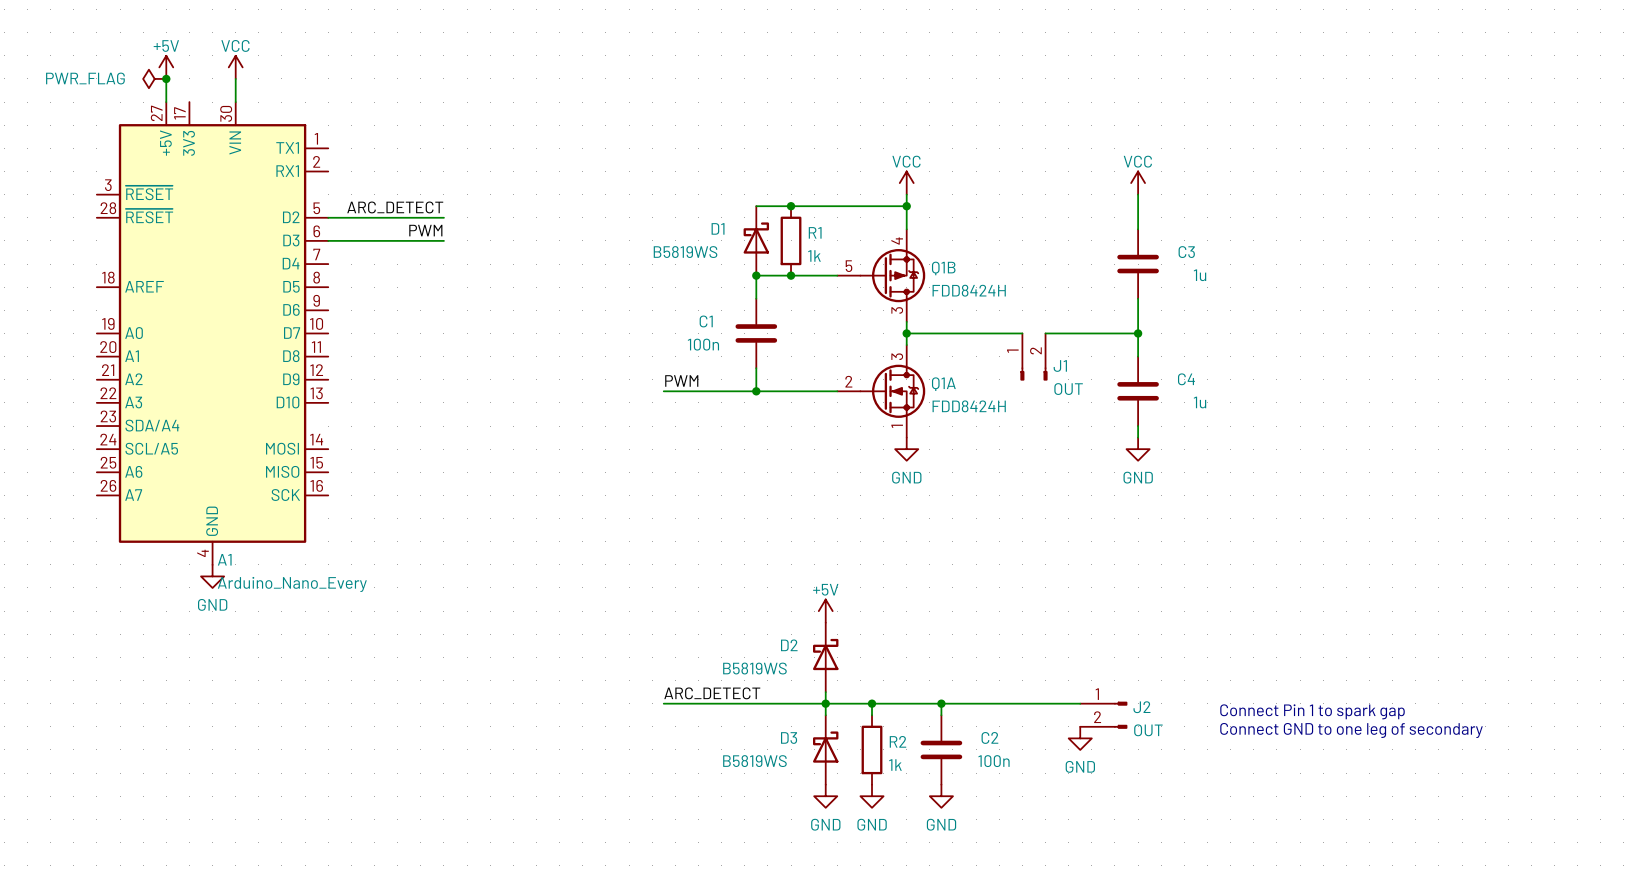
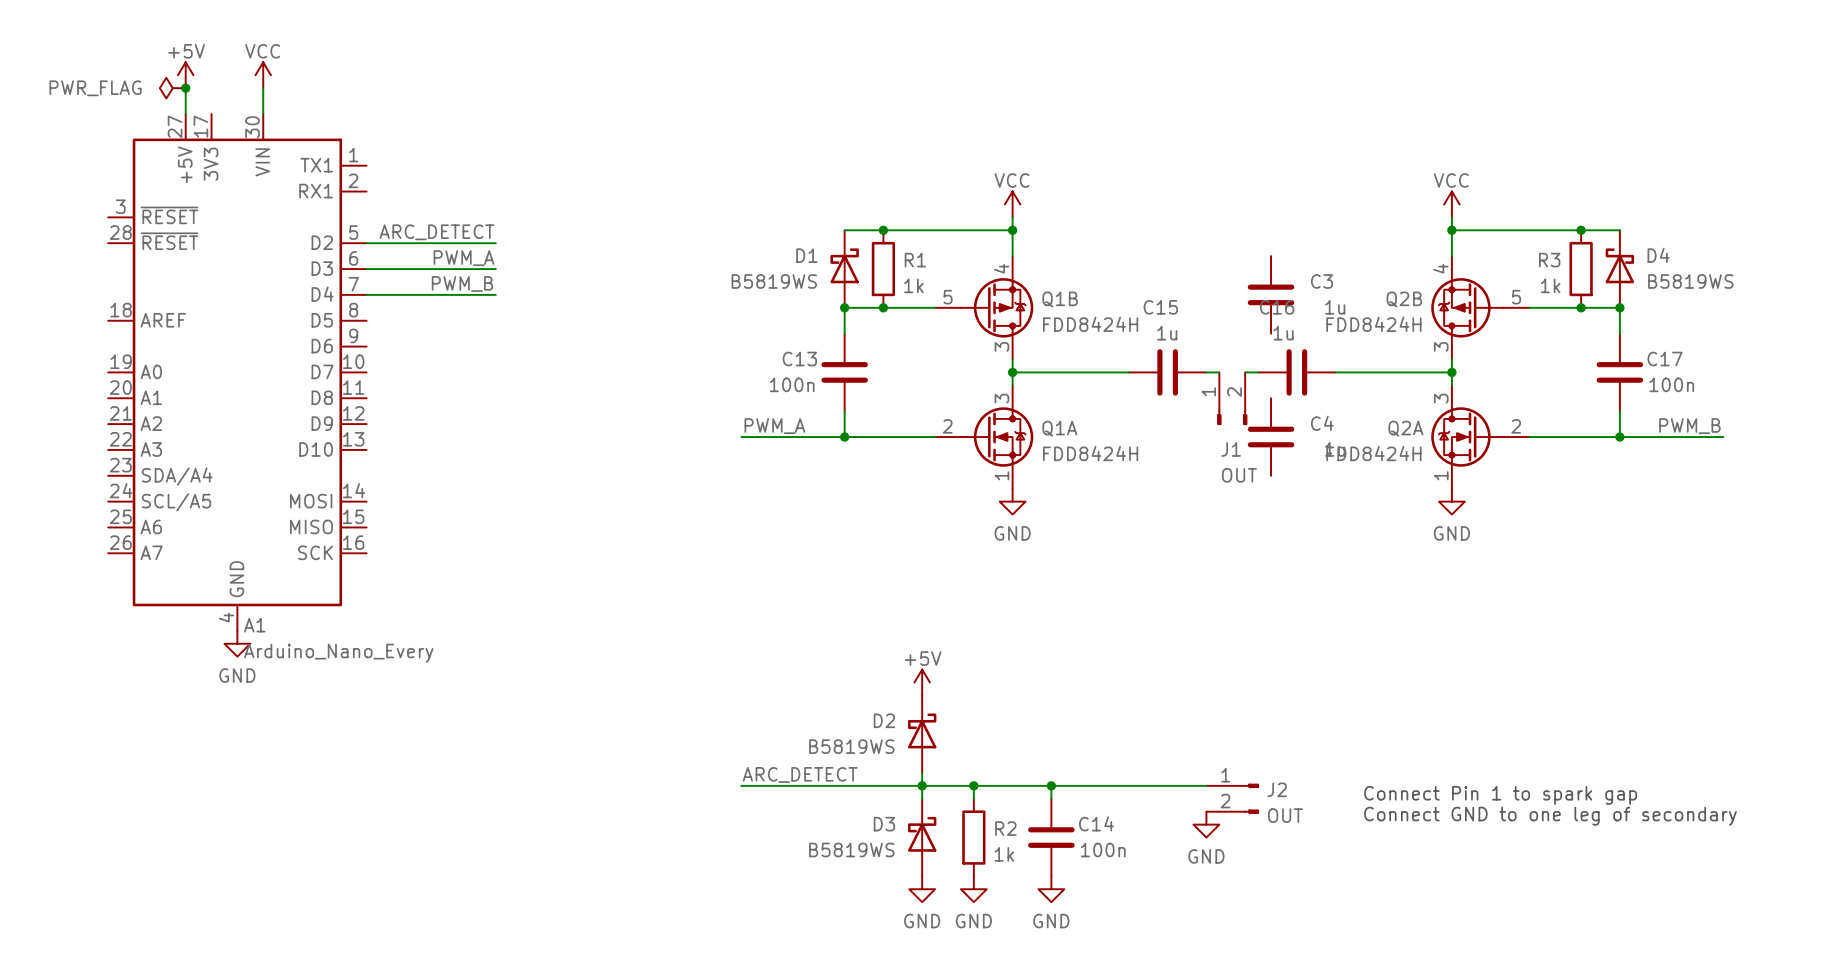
power symbol position: VCC (1138, 183) -> VCC (1451, 204)
wire: (1138, 194) (1138, 229) -> (1451, 217) (1451, 256)
wire: none -> (1451, 230) (1619, 230)
junction: none -> (1451, 230)
junction: none -> (1581, 230)
label: PWM (425, 230) -> PWM_A (464, 258)
R3: none -> 1k (1581, 269)
D4: none -> B5819WS (1619, 269)
label: none -> PWM_B (462, 283)
wire: none -> (366, 294) (495, 294)
Q2B: none -> FDD8424H (1480, 307)
wire: none -> (1529, 307) (1619, 307) (1619, 333)
junction: none -> (1581, 307)
junction: none -> (1619, 307)
wire: (1138, 298) (1138, 356) -> none
C1 name: C1 (706, 321) -> C13 (799, 359)
wire: none -> (1451, 359) (1451, 385)
C15: none -> 1u (1167, 372)
wire: (1091, 333) (1114, 333) -> none
junction: (1138, 333) -> none
C16: none -> 1u (1296, 372)
wire: none -> (1335, 372) (1451, 372)
junction: none -> (1451, 372)
C17: none -> 100n (1619, 372)
J1 position: (1033, 356) -> (1232, 398)
J1 name position: J1 (1060, 365) -> J1 (1231, 449)
wire: none -> (1619, 411) (1619, 437)
label: PWM (681, 380) -> PWM_A (774, 426)
label: none -> PWM_B (1689, 426)
J1 value position: OUT (1068, 389) -> OUT (1239, 475)
Q2A: none -> FDD8424H (1480, 437)
wire: none -> (1529, 437) (1723, 437)
junction: none -> (1619, 437)
wire: (1138, 426) (1138, 437) -> none
power symbol position: GND (1138, 449) -> GND (1451, 501)
C2 name: C2 (989, 737) -> C14 (1096, 823)

